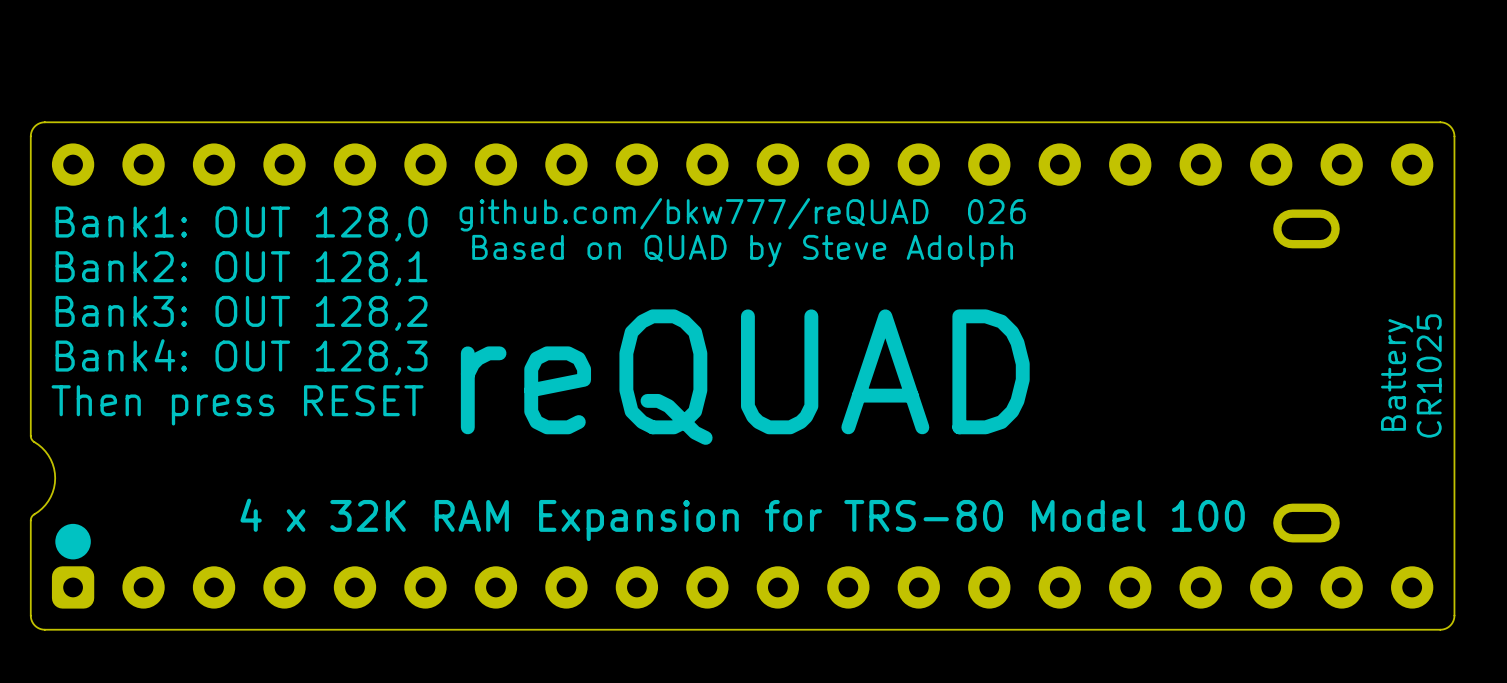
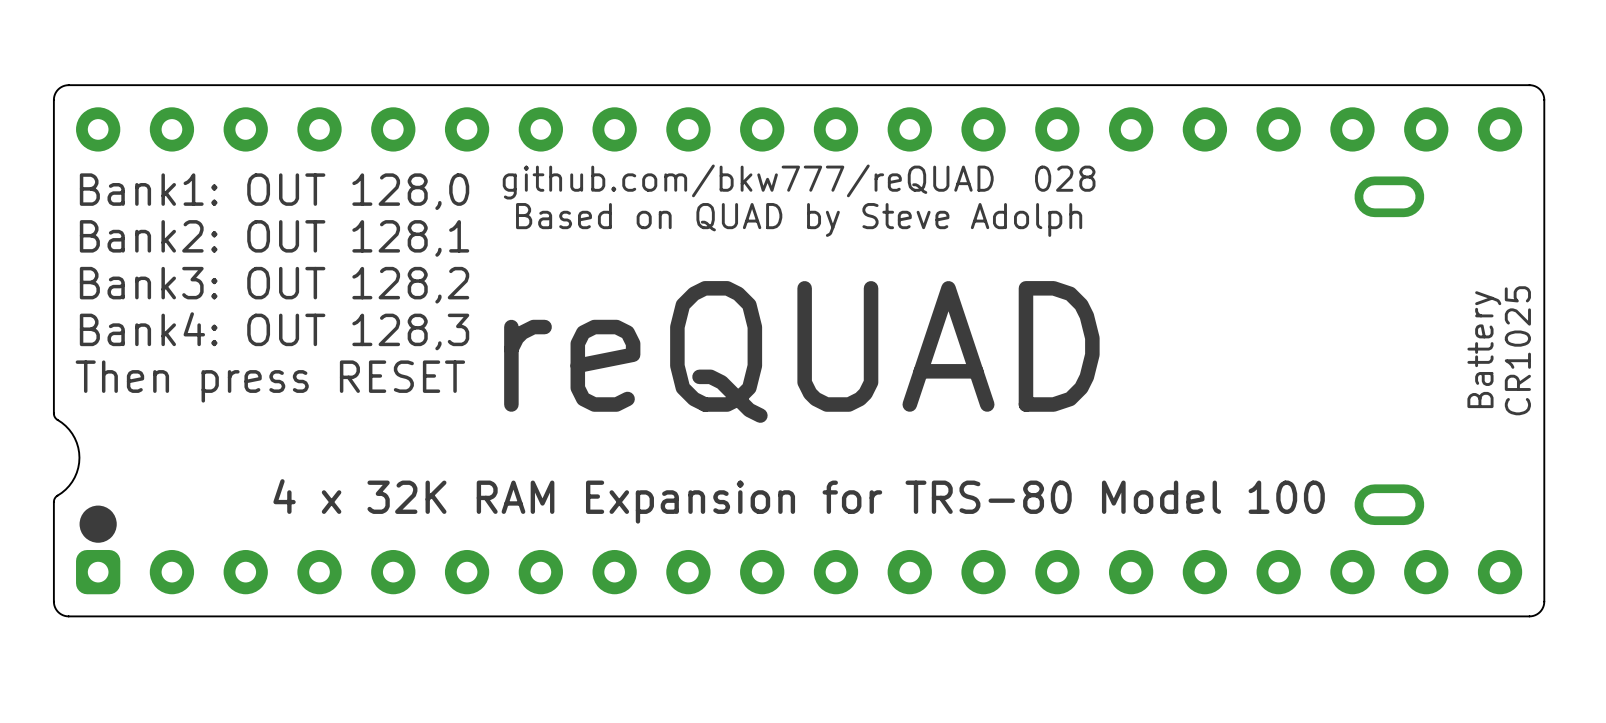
text: github.com/bkw777/reQUAD 026 (742, 214) -> github.com/bkw777/reQUAD 028 (799, 182)

